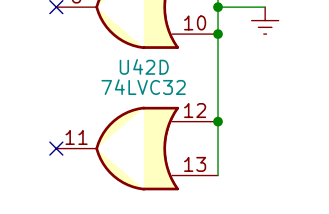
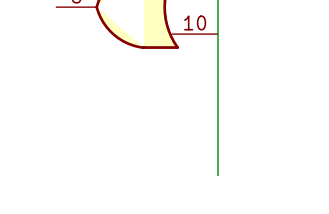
no-connect mark: (56, 7) -> none
wire: (218, 7) (265, 7) -> none
junction: (218, 7) -> none
power symbol: (265, 20) -> none
junction: (218, 34) -> none
junction: (218, 121) -> none
no-connect mark: (56, 148) -> none
U42D: 74LVC32 (137, 148) -> none

